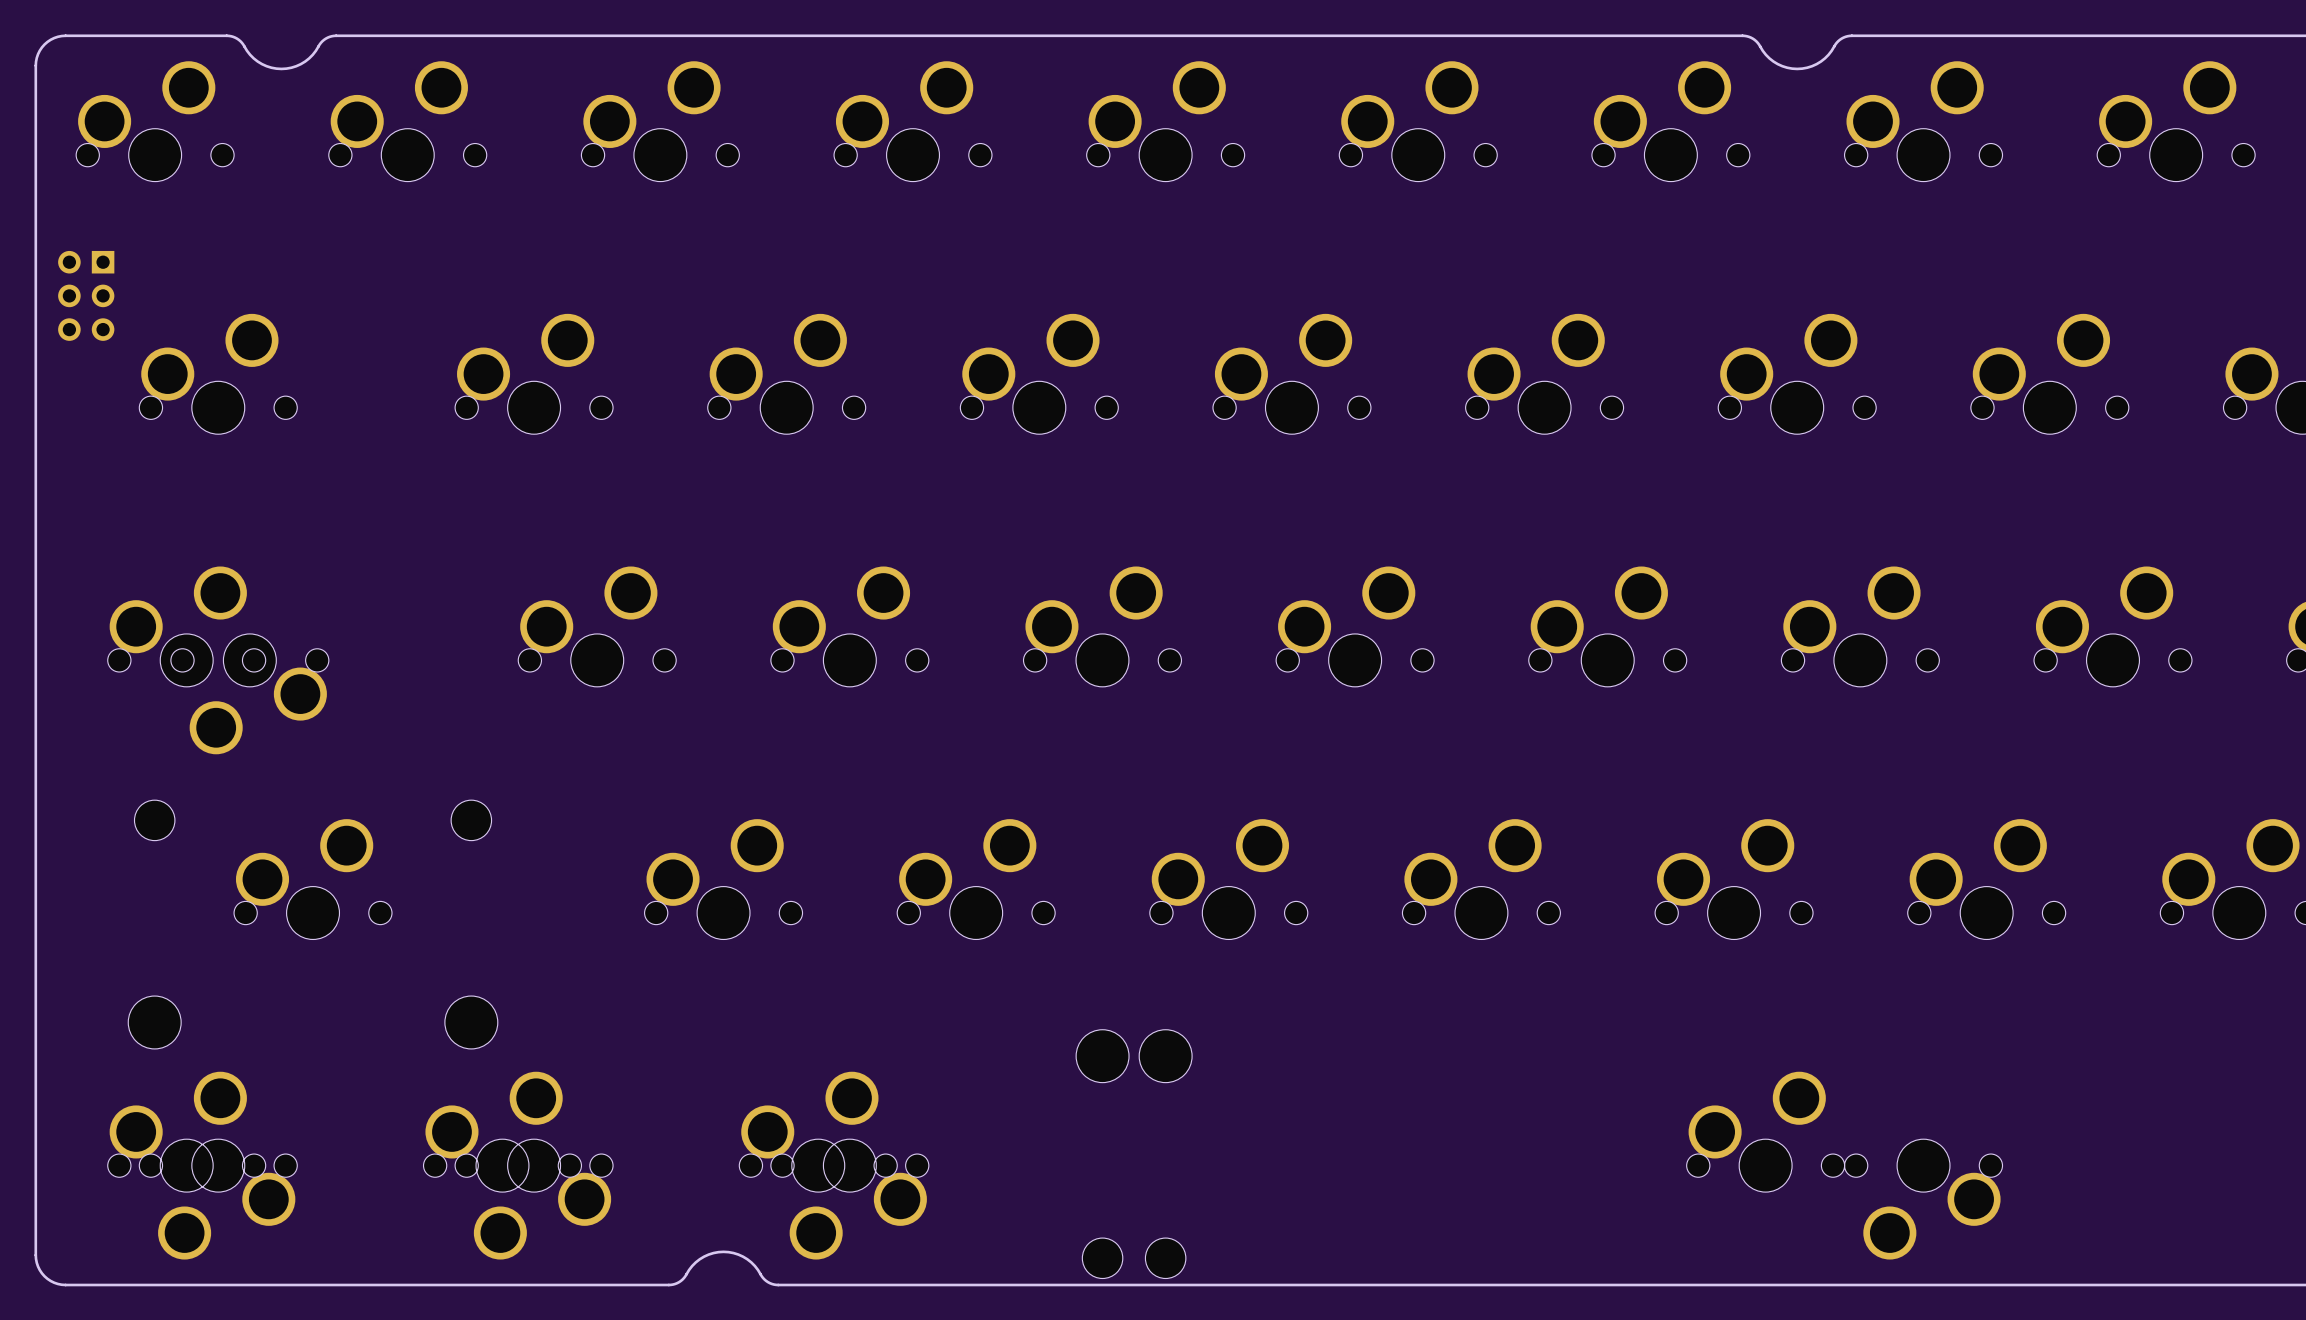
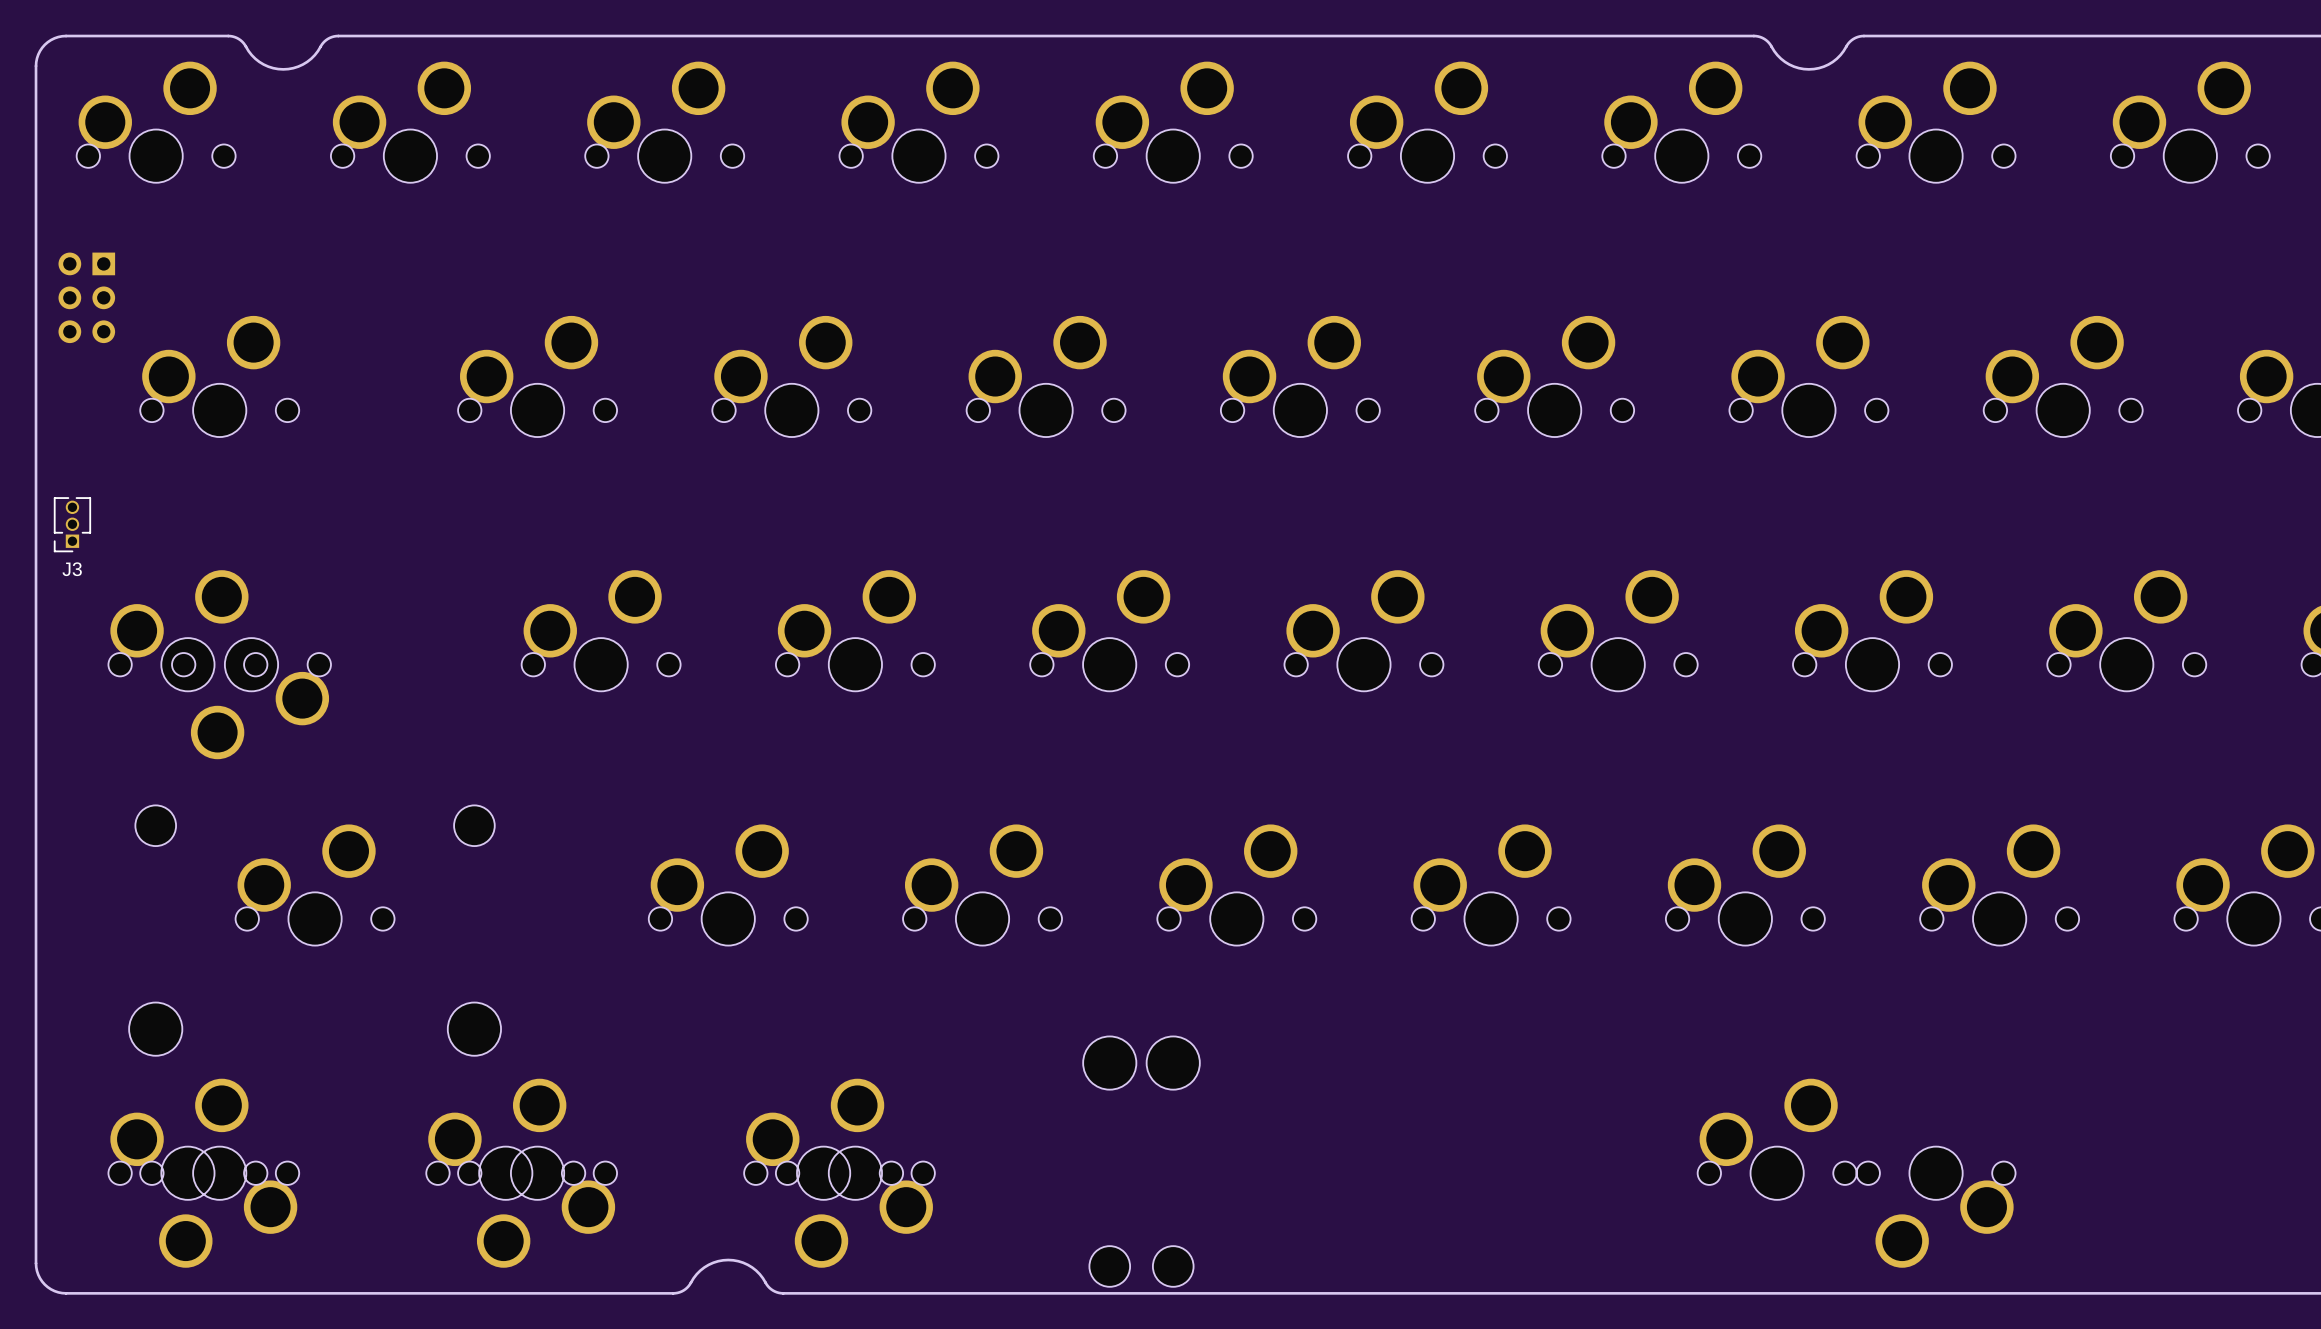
J3: none -> (72, 524)

